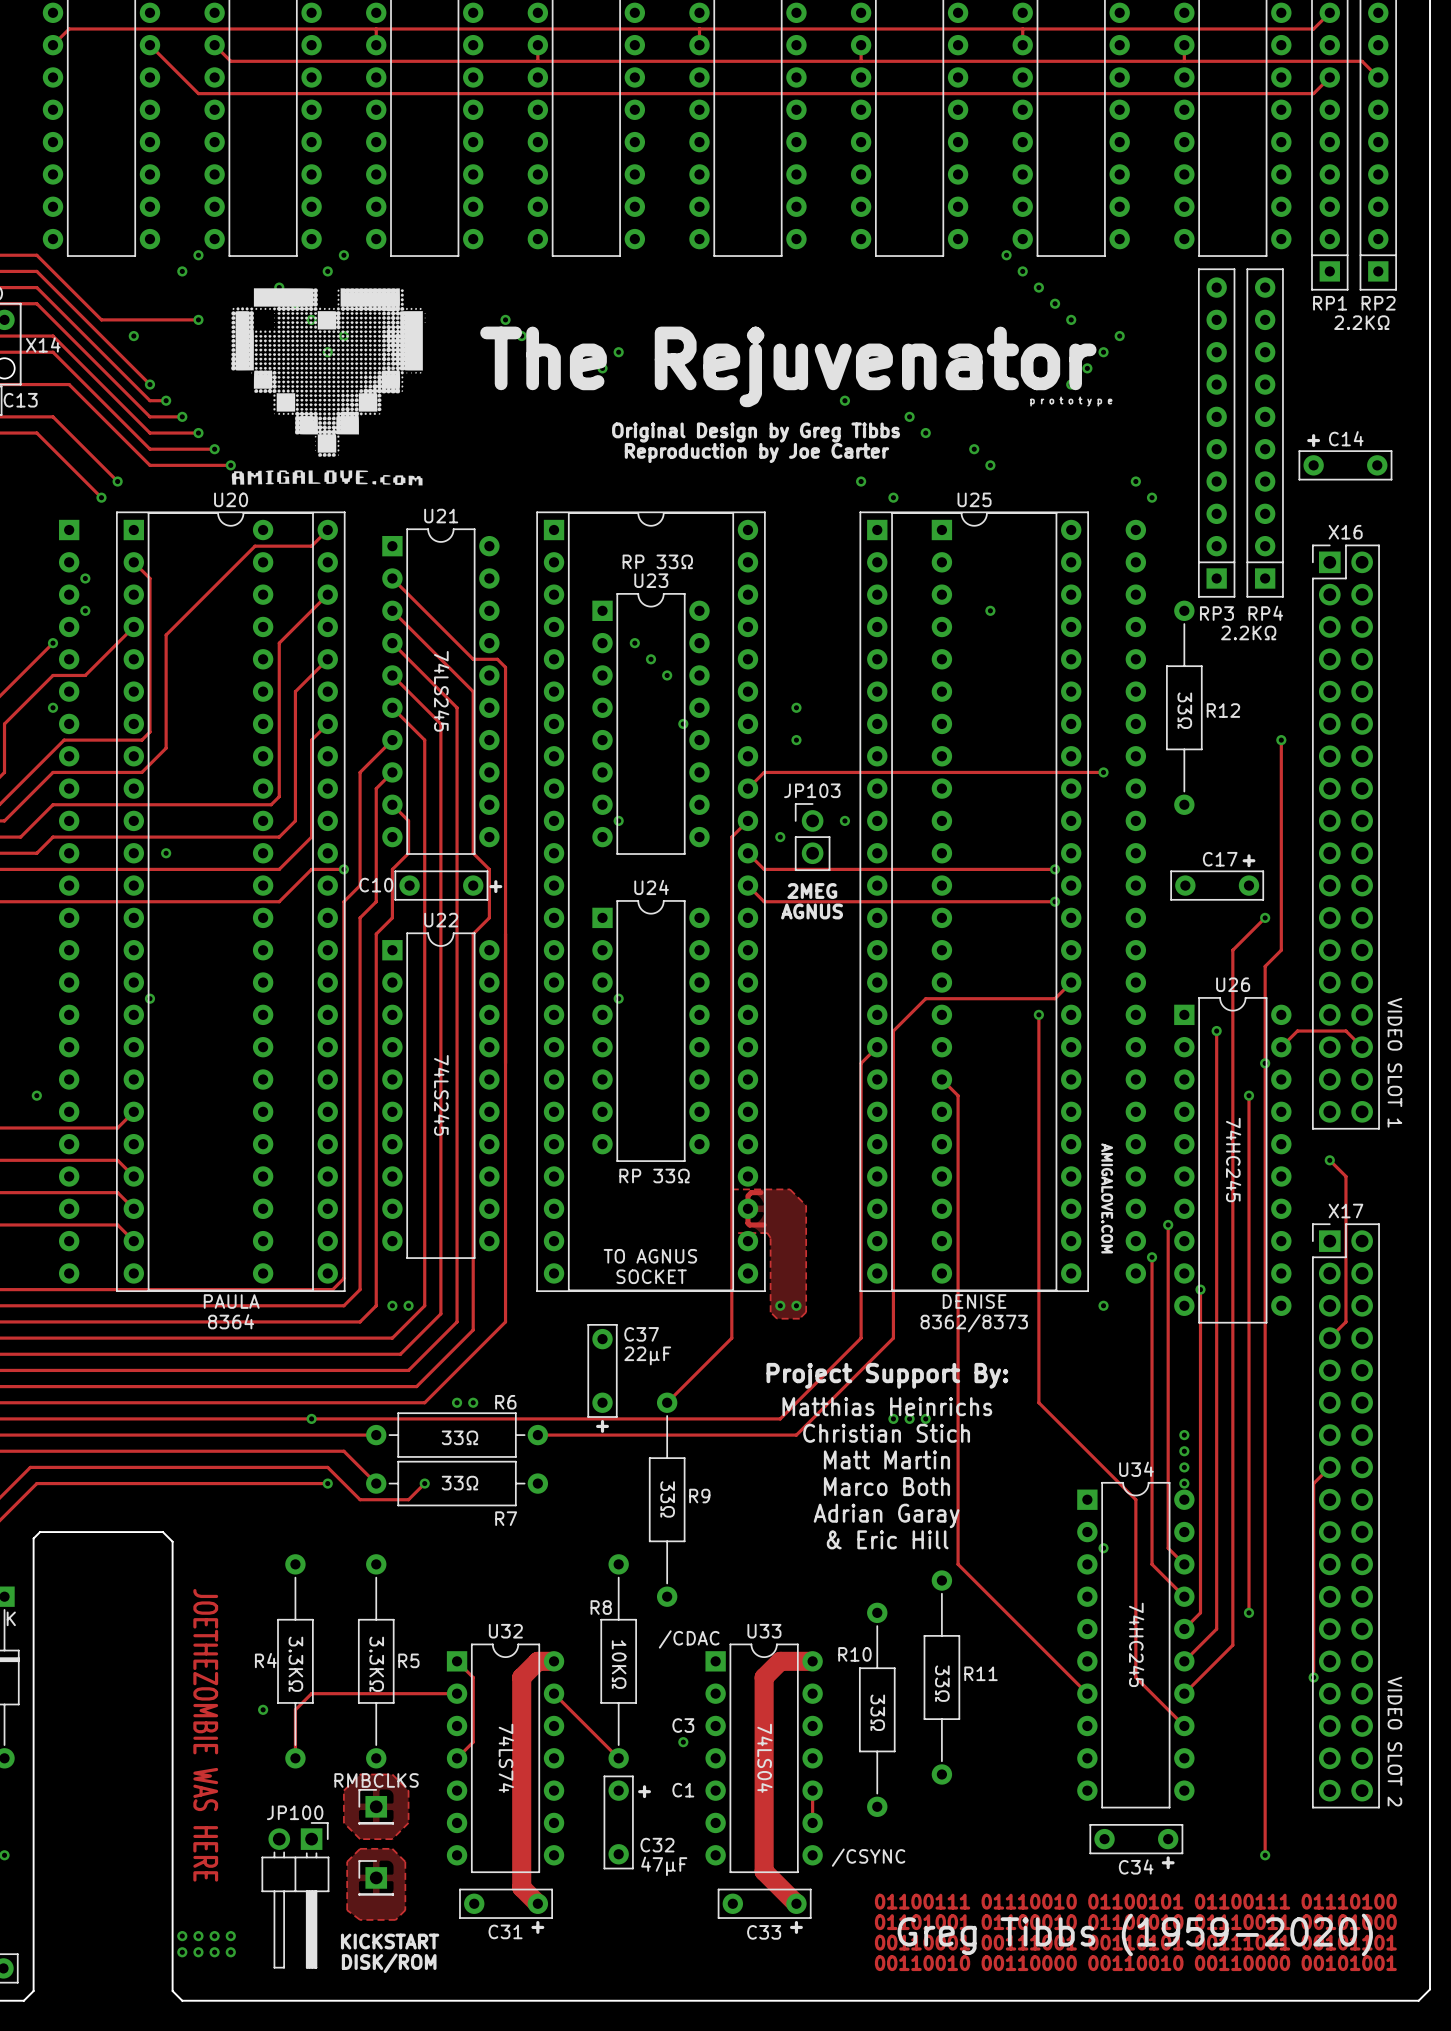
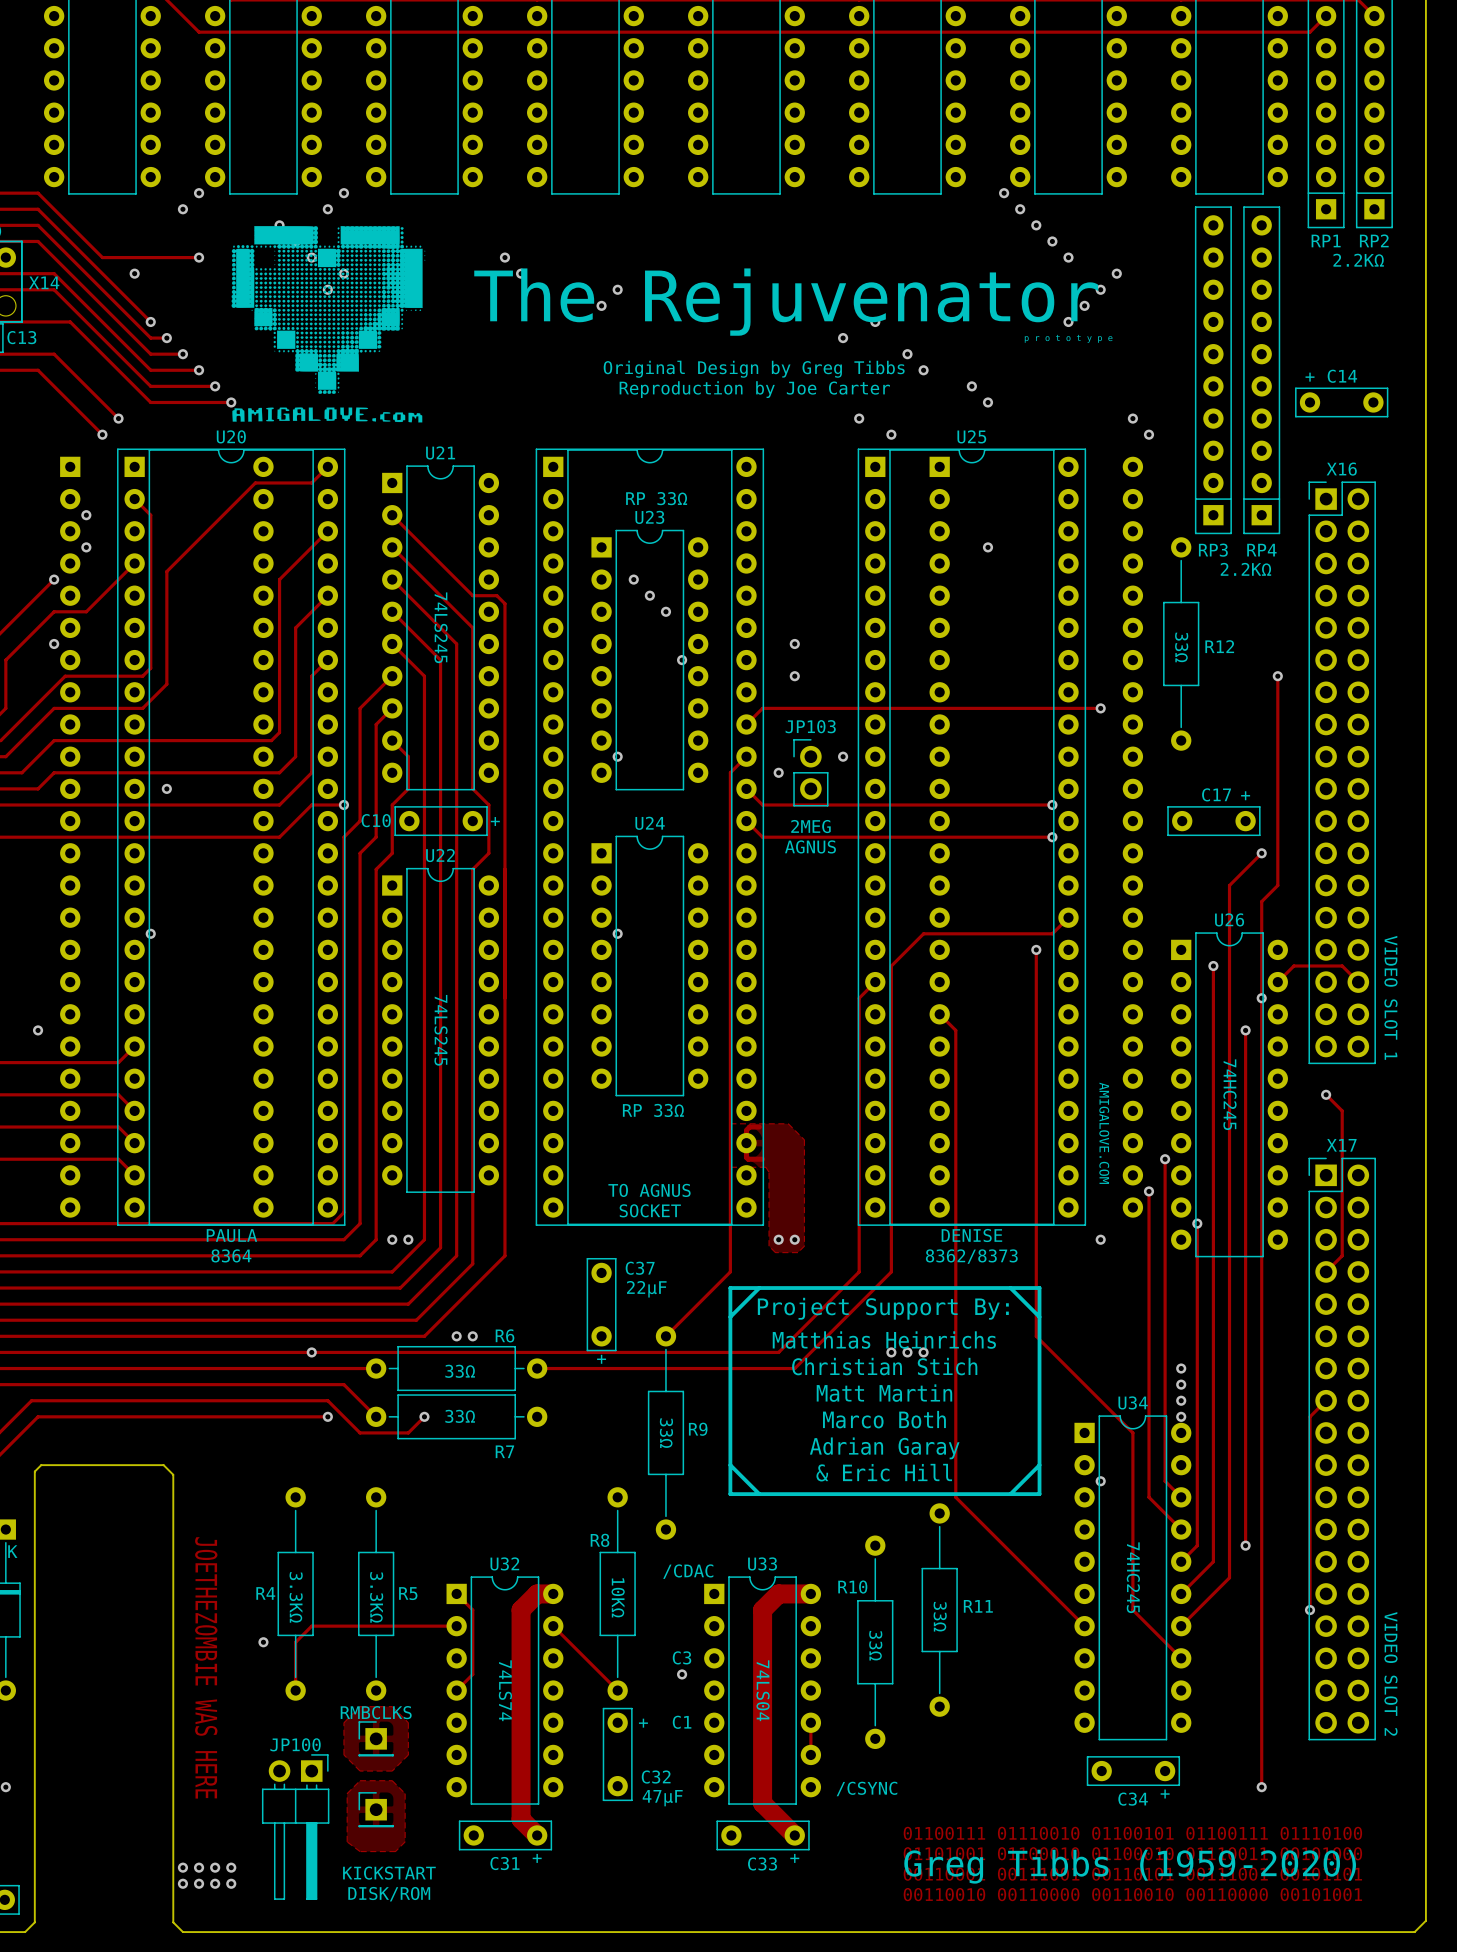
line: none -> (730, 1288) (730, 1494) (1039, 1494) (1039, 1288) (730, 1288)
line: none -> (759, 1288) (730, 1317)
line: none -> (1010, 1288) (1039, 1317)
line: none -> (730, 1465) (759, 1494)
line: none -> (1039, 1465) (1010, 1494)

